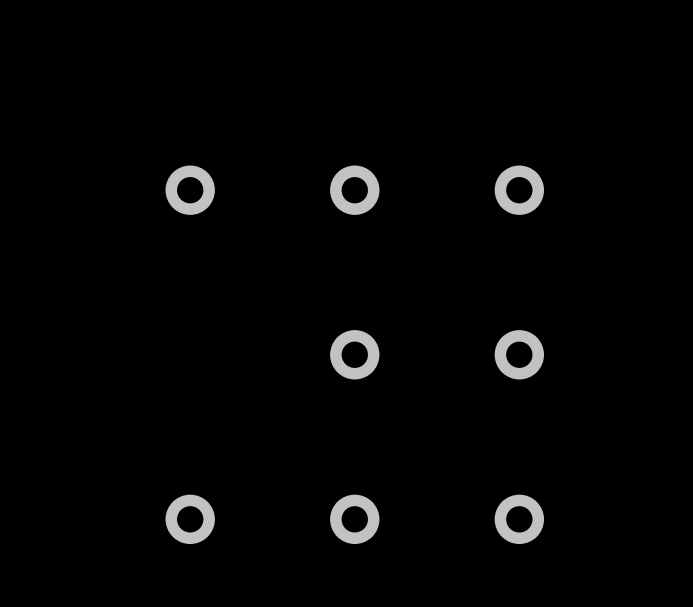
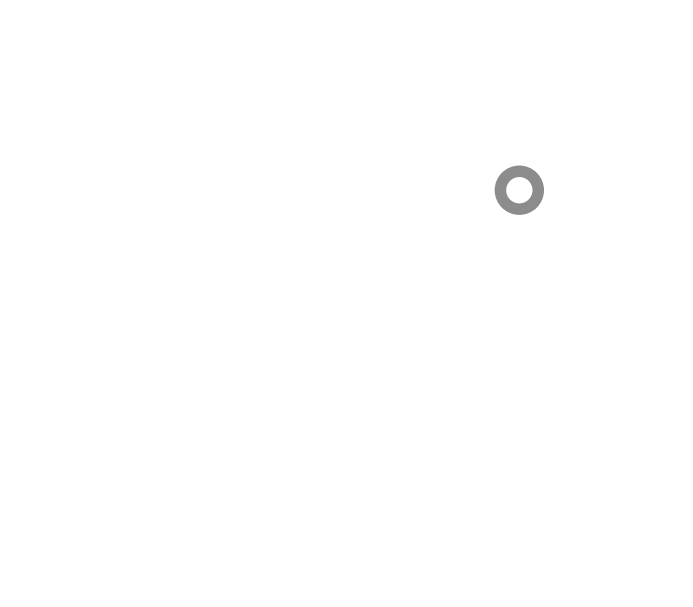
via: (190, 190) -> none
via: (354, 190) -> none
via: (354, 354) -> none
via: (519, 354) -> none
via: (190, 519) -> none
via: (354, 519) -> none
via: (519, 519) -> none

